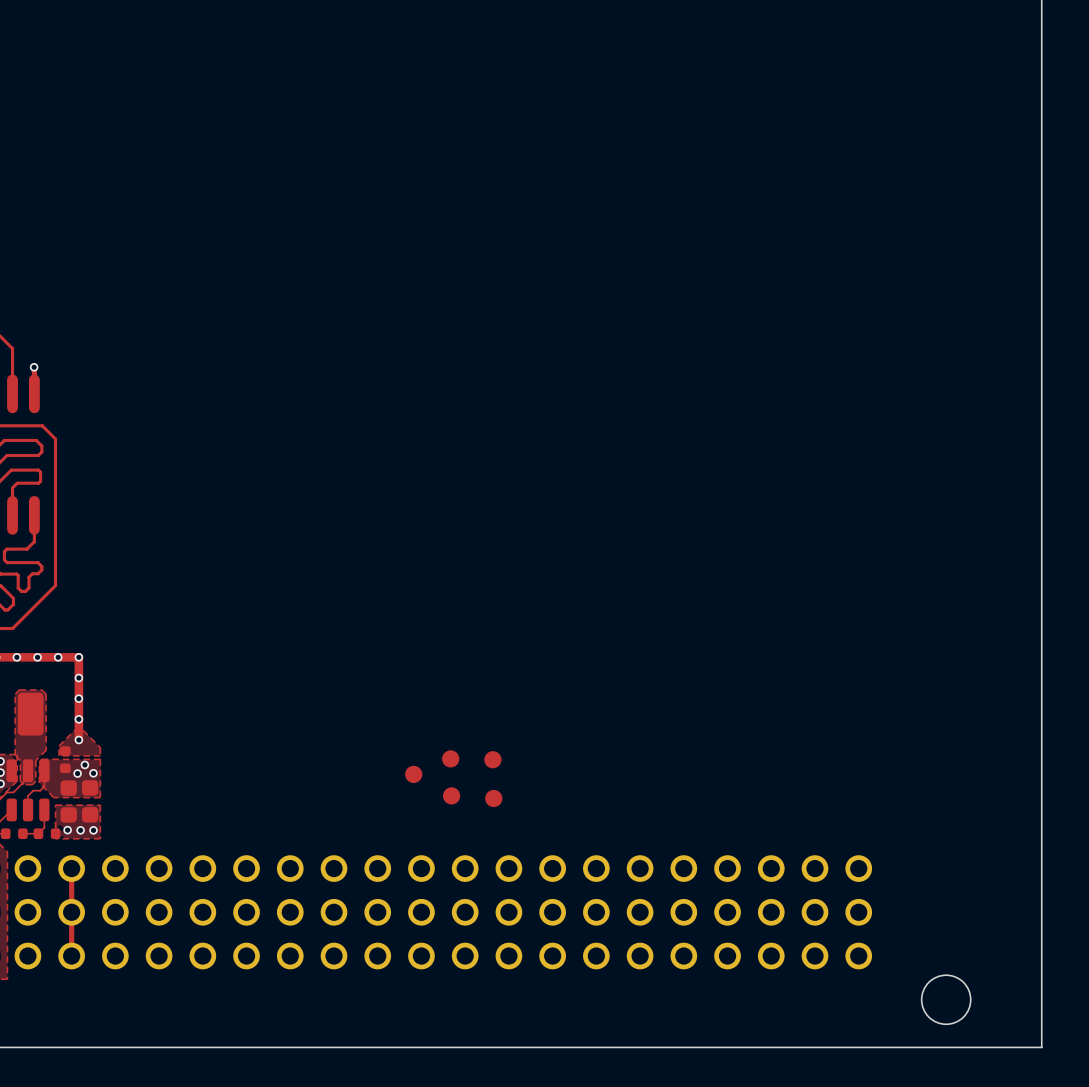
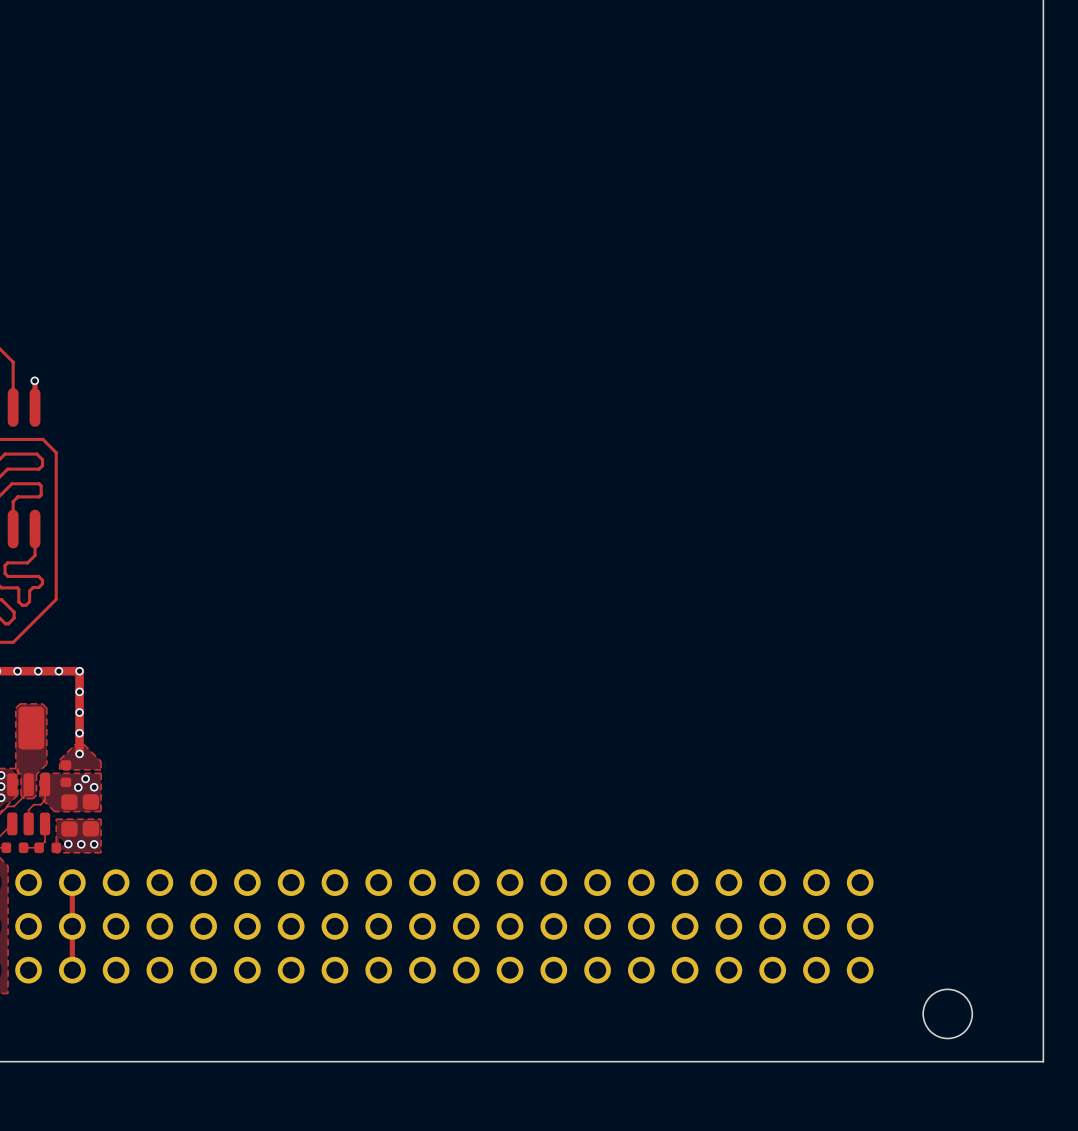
part: (450, 758) -> none
part: (492, 759) -> none
part: (413, 774) -> none
part: (451, 795) -> none
part: (493, 798) -> none

